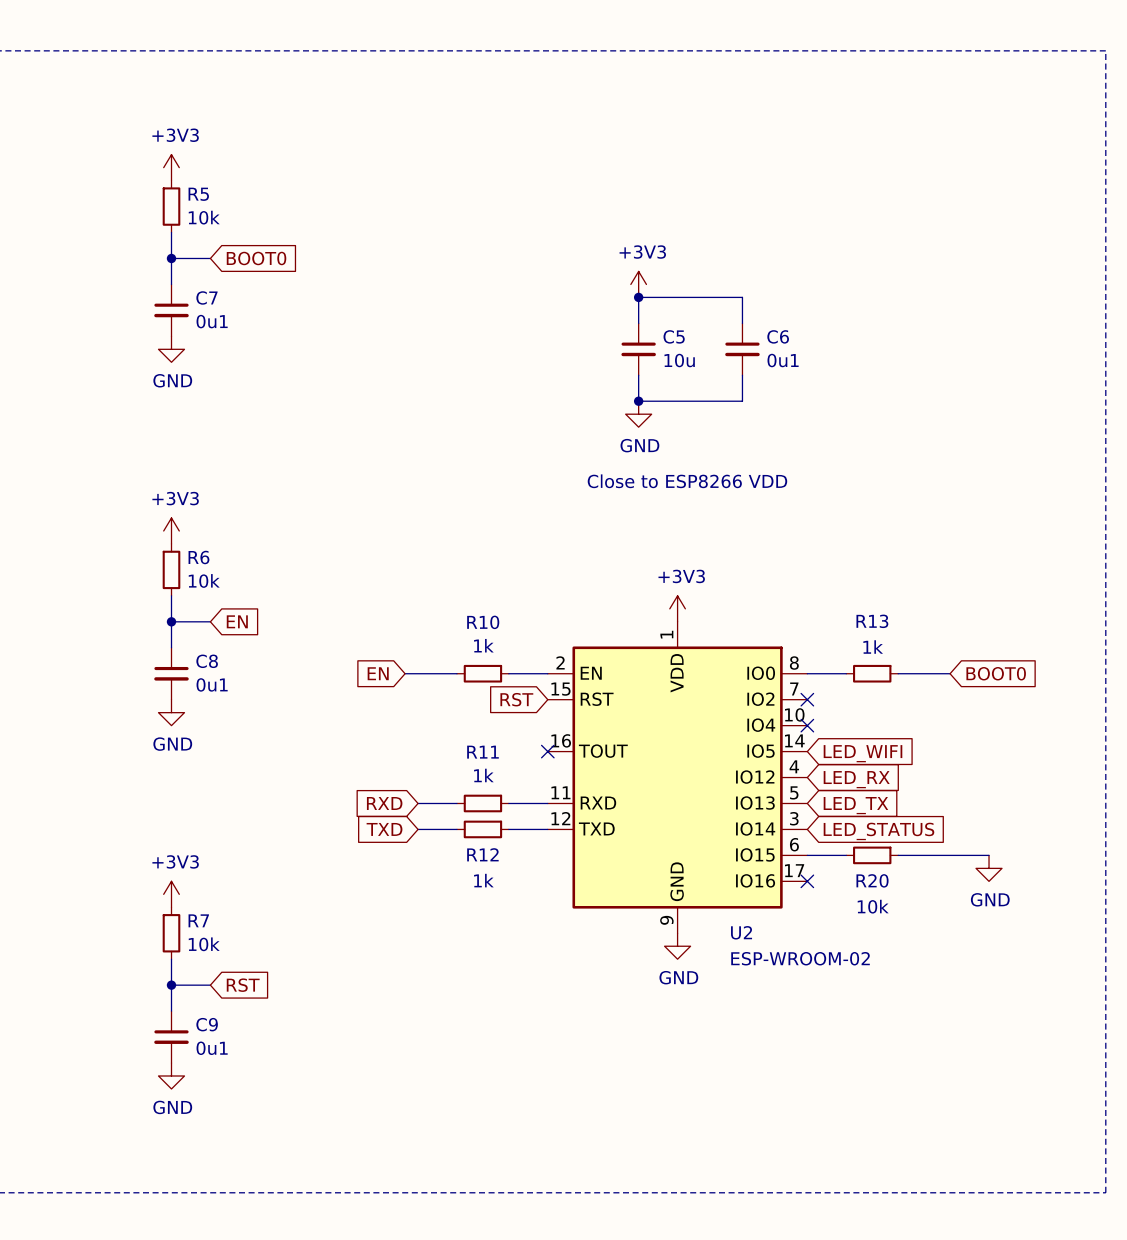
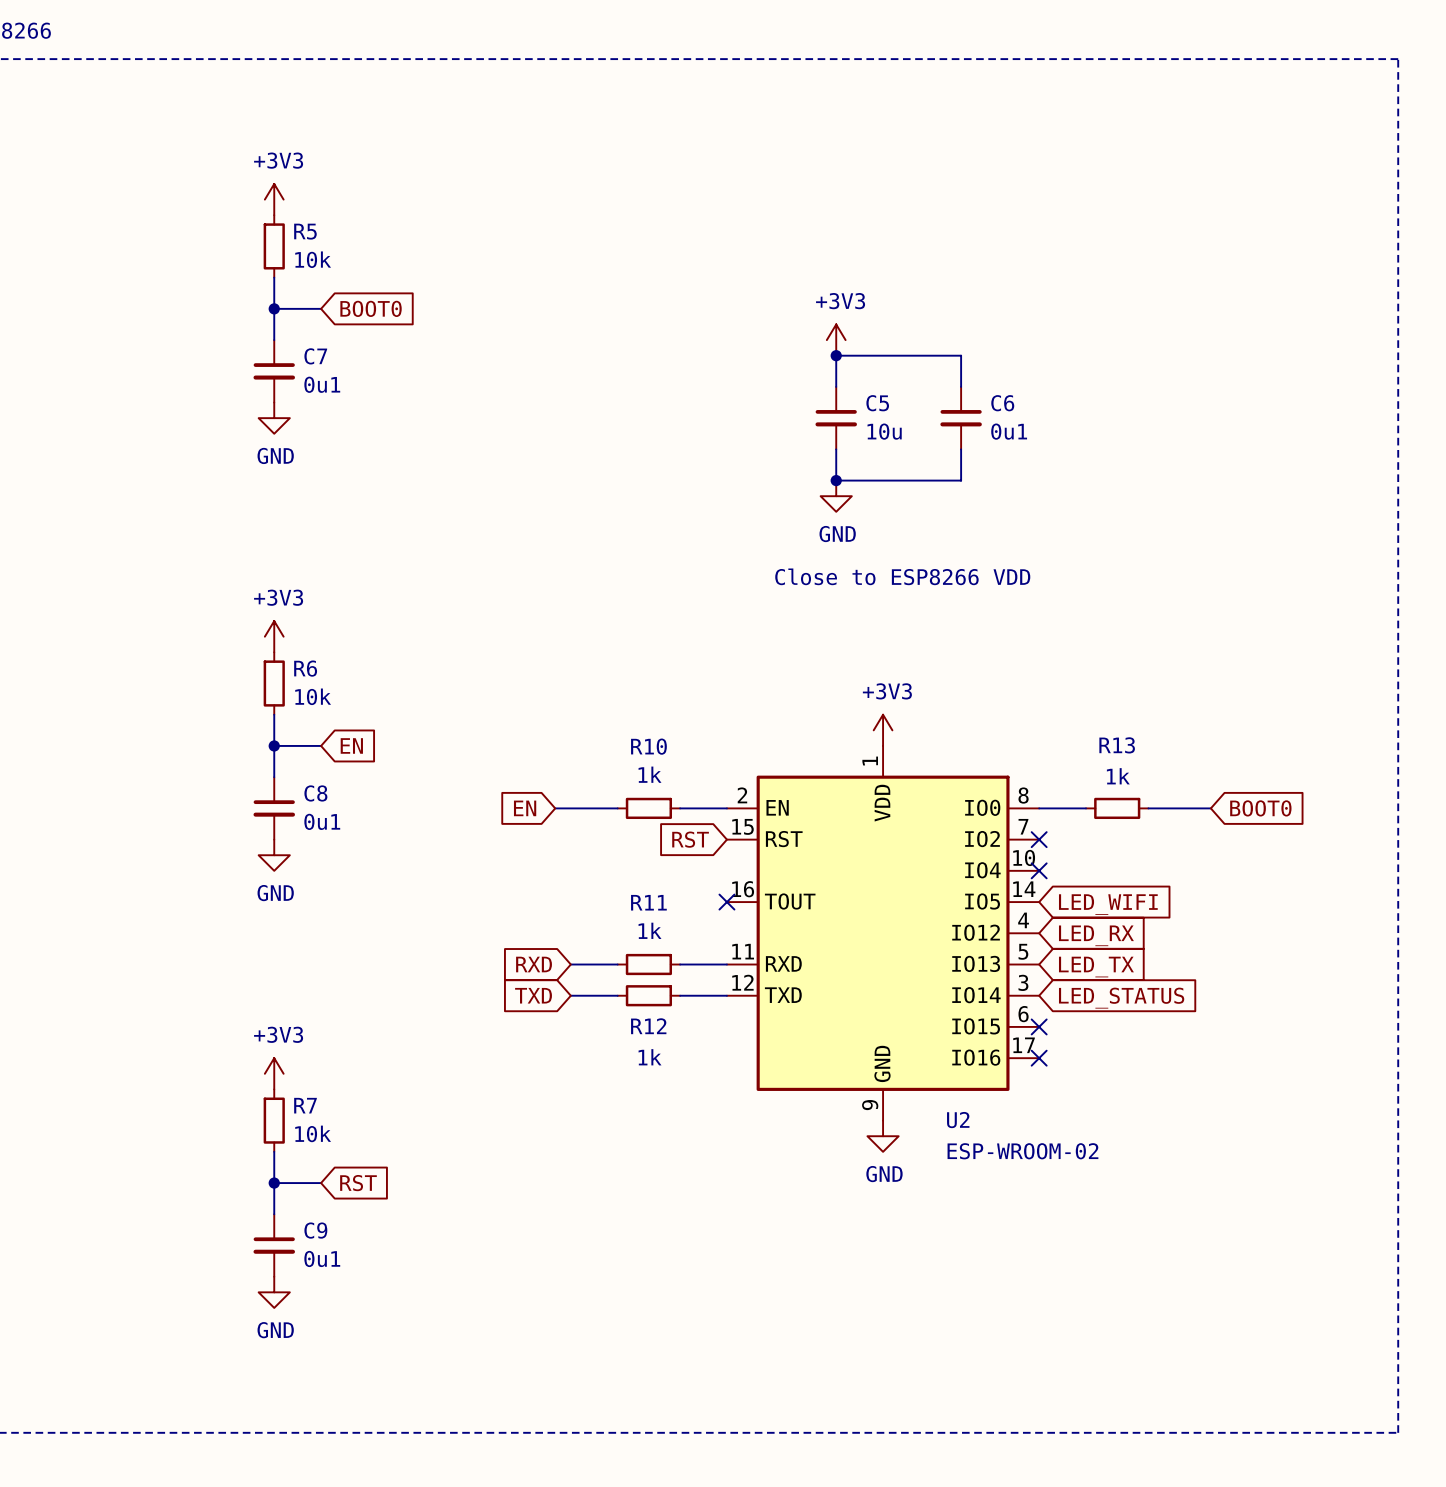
wire: (807, 855) (846, 855) -> none
no-connect mark: none -> (1039, 1026)
R20: 10k (872, 855) -> none
wire: (898, 855) (989, 855) -> none
power symbol: GND (989, 868) -> none

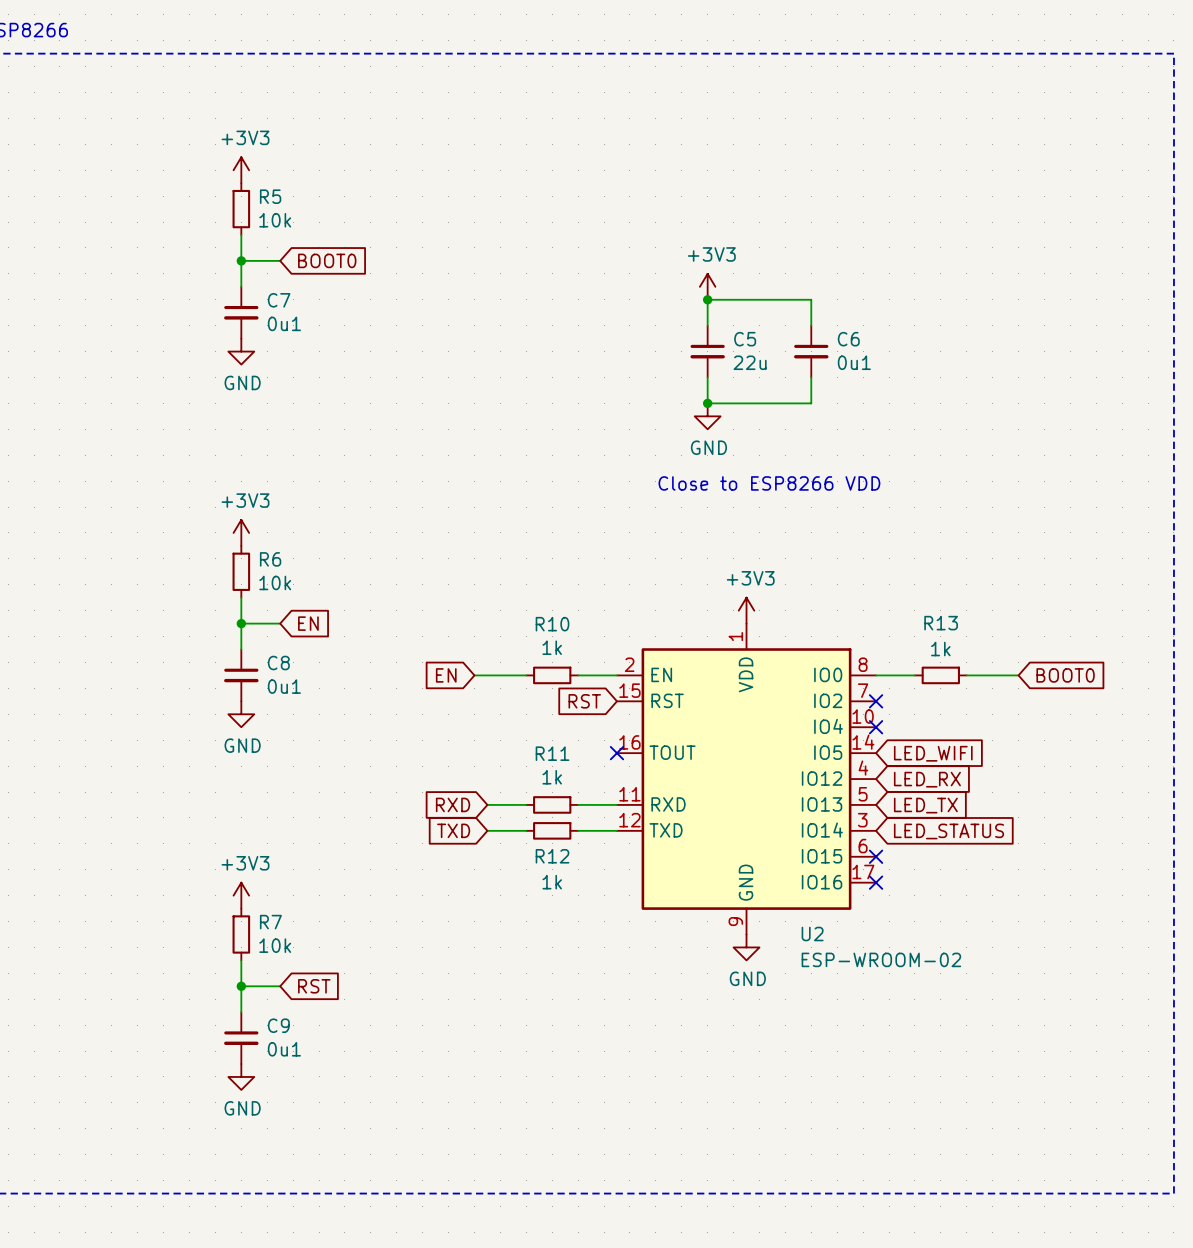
C5 value: 10u (884, 431) -> 22u (750, 362)

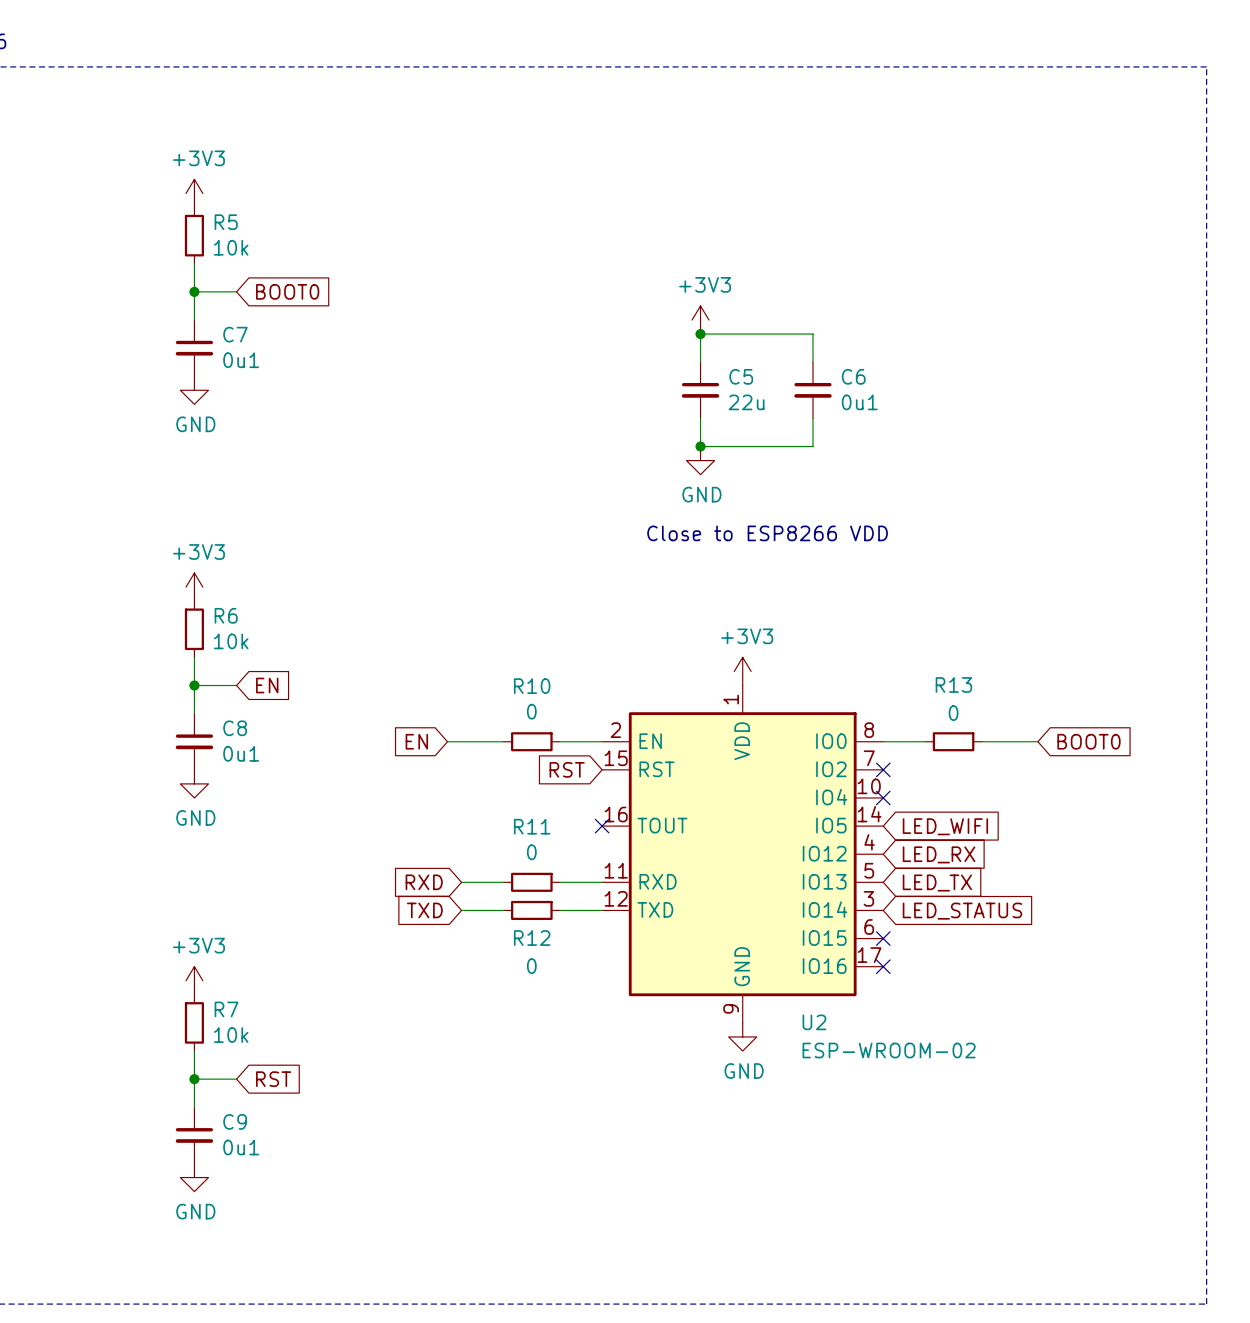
R10 value: 1k (552, 647) -> 0 (531, 711)
R13 value: 1k (940, 649) -> 0 (953, 713)
R11 value: 1k (552, 777) -> 0 (531, 852)
R12 value: 1k (552, 882) -> 0 (531, 966)

